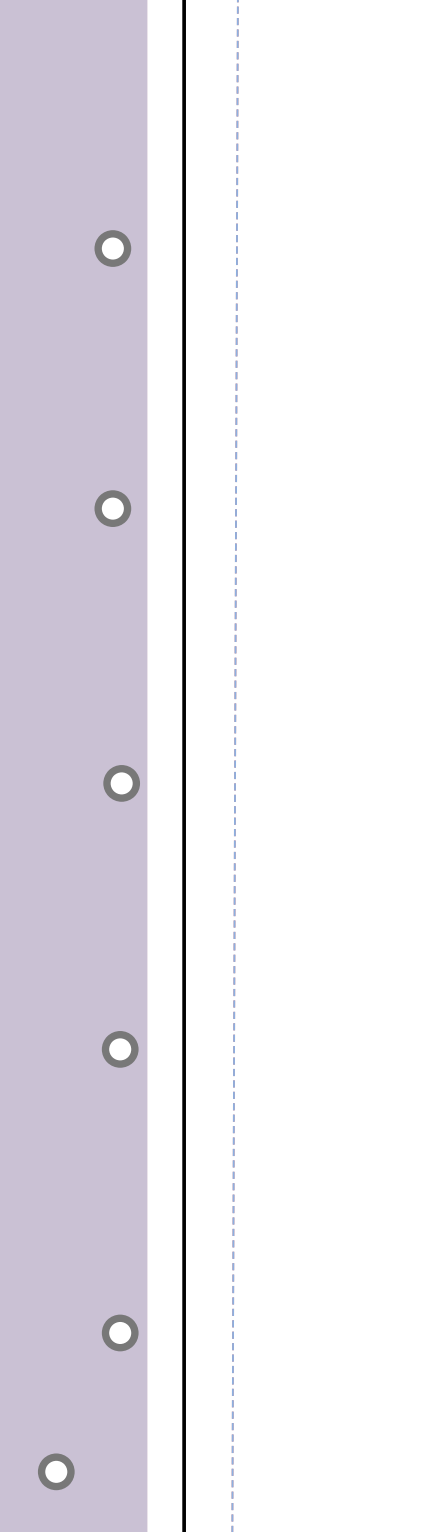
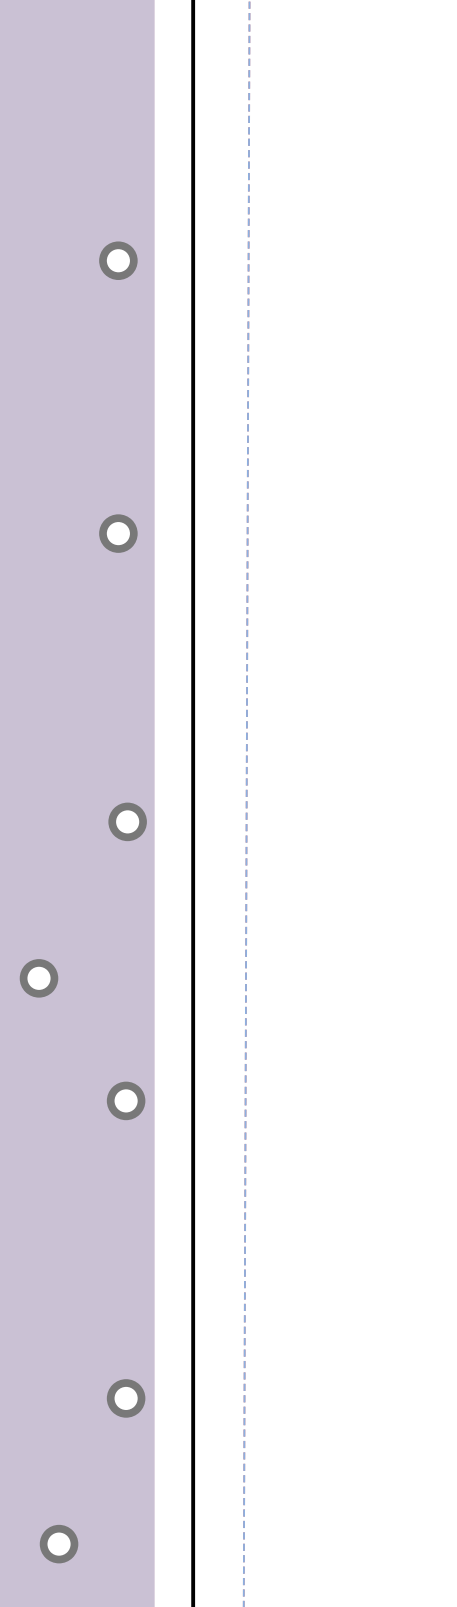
via: none -> (39, 978)

